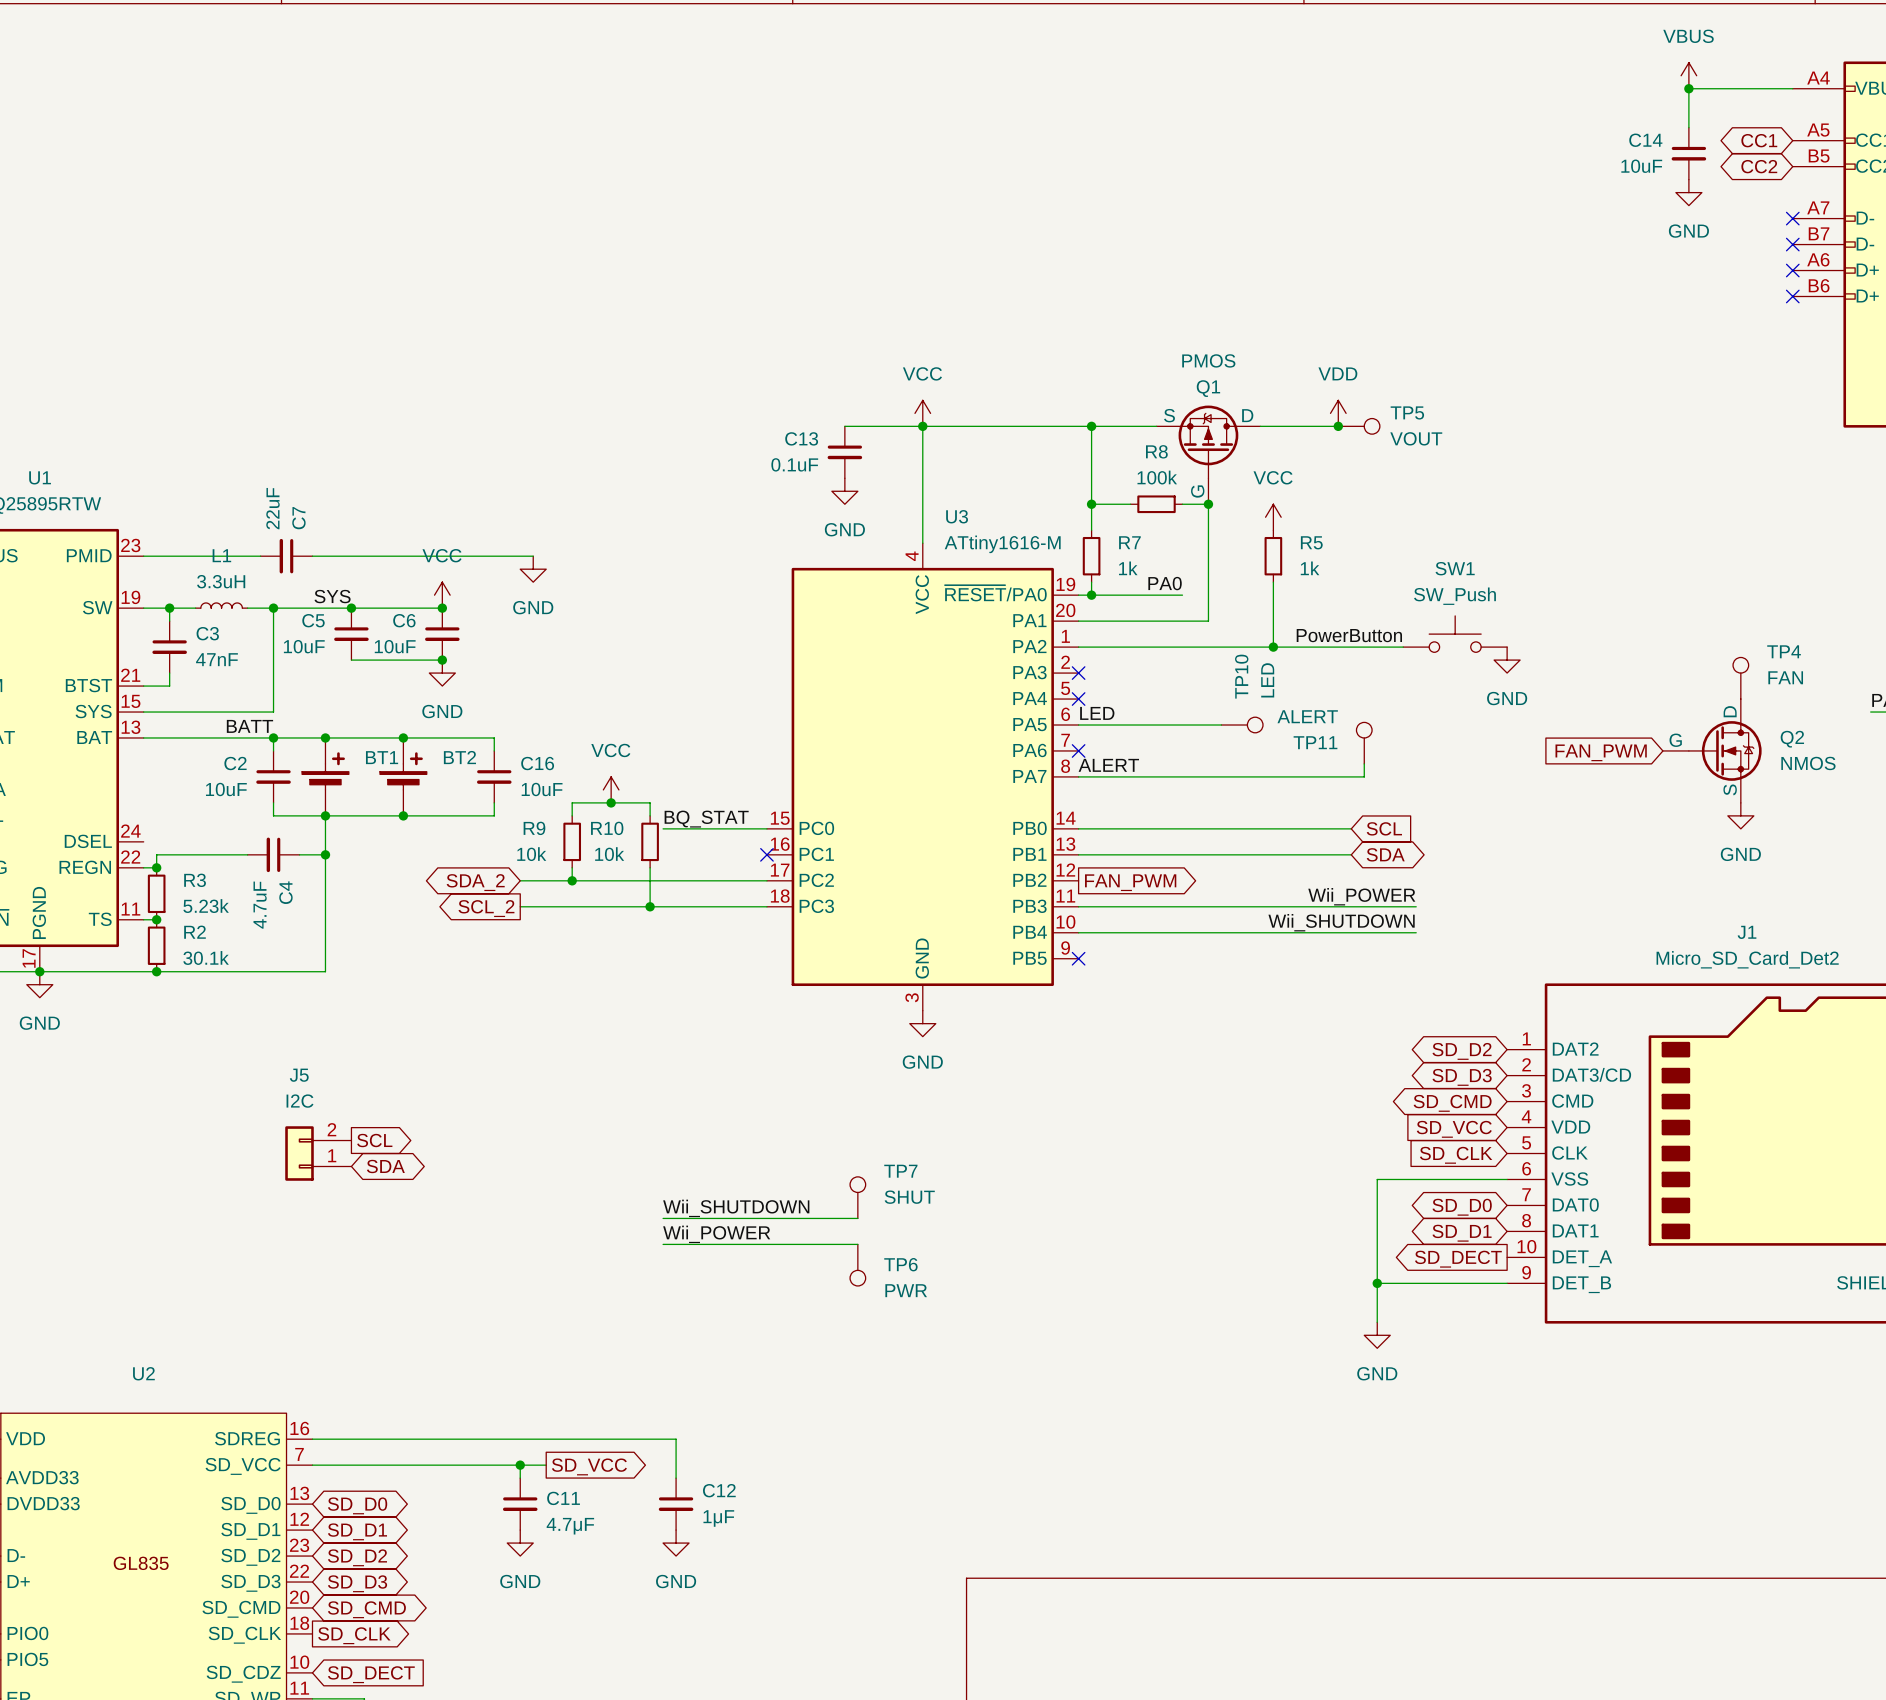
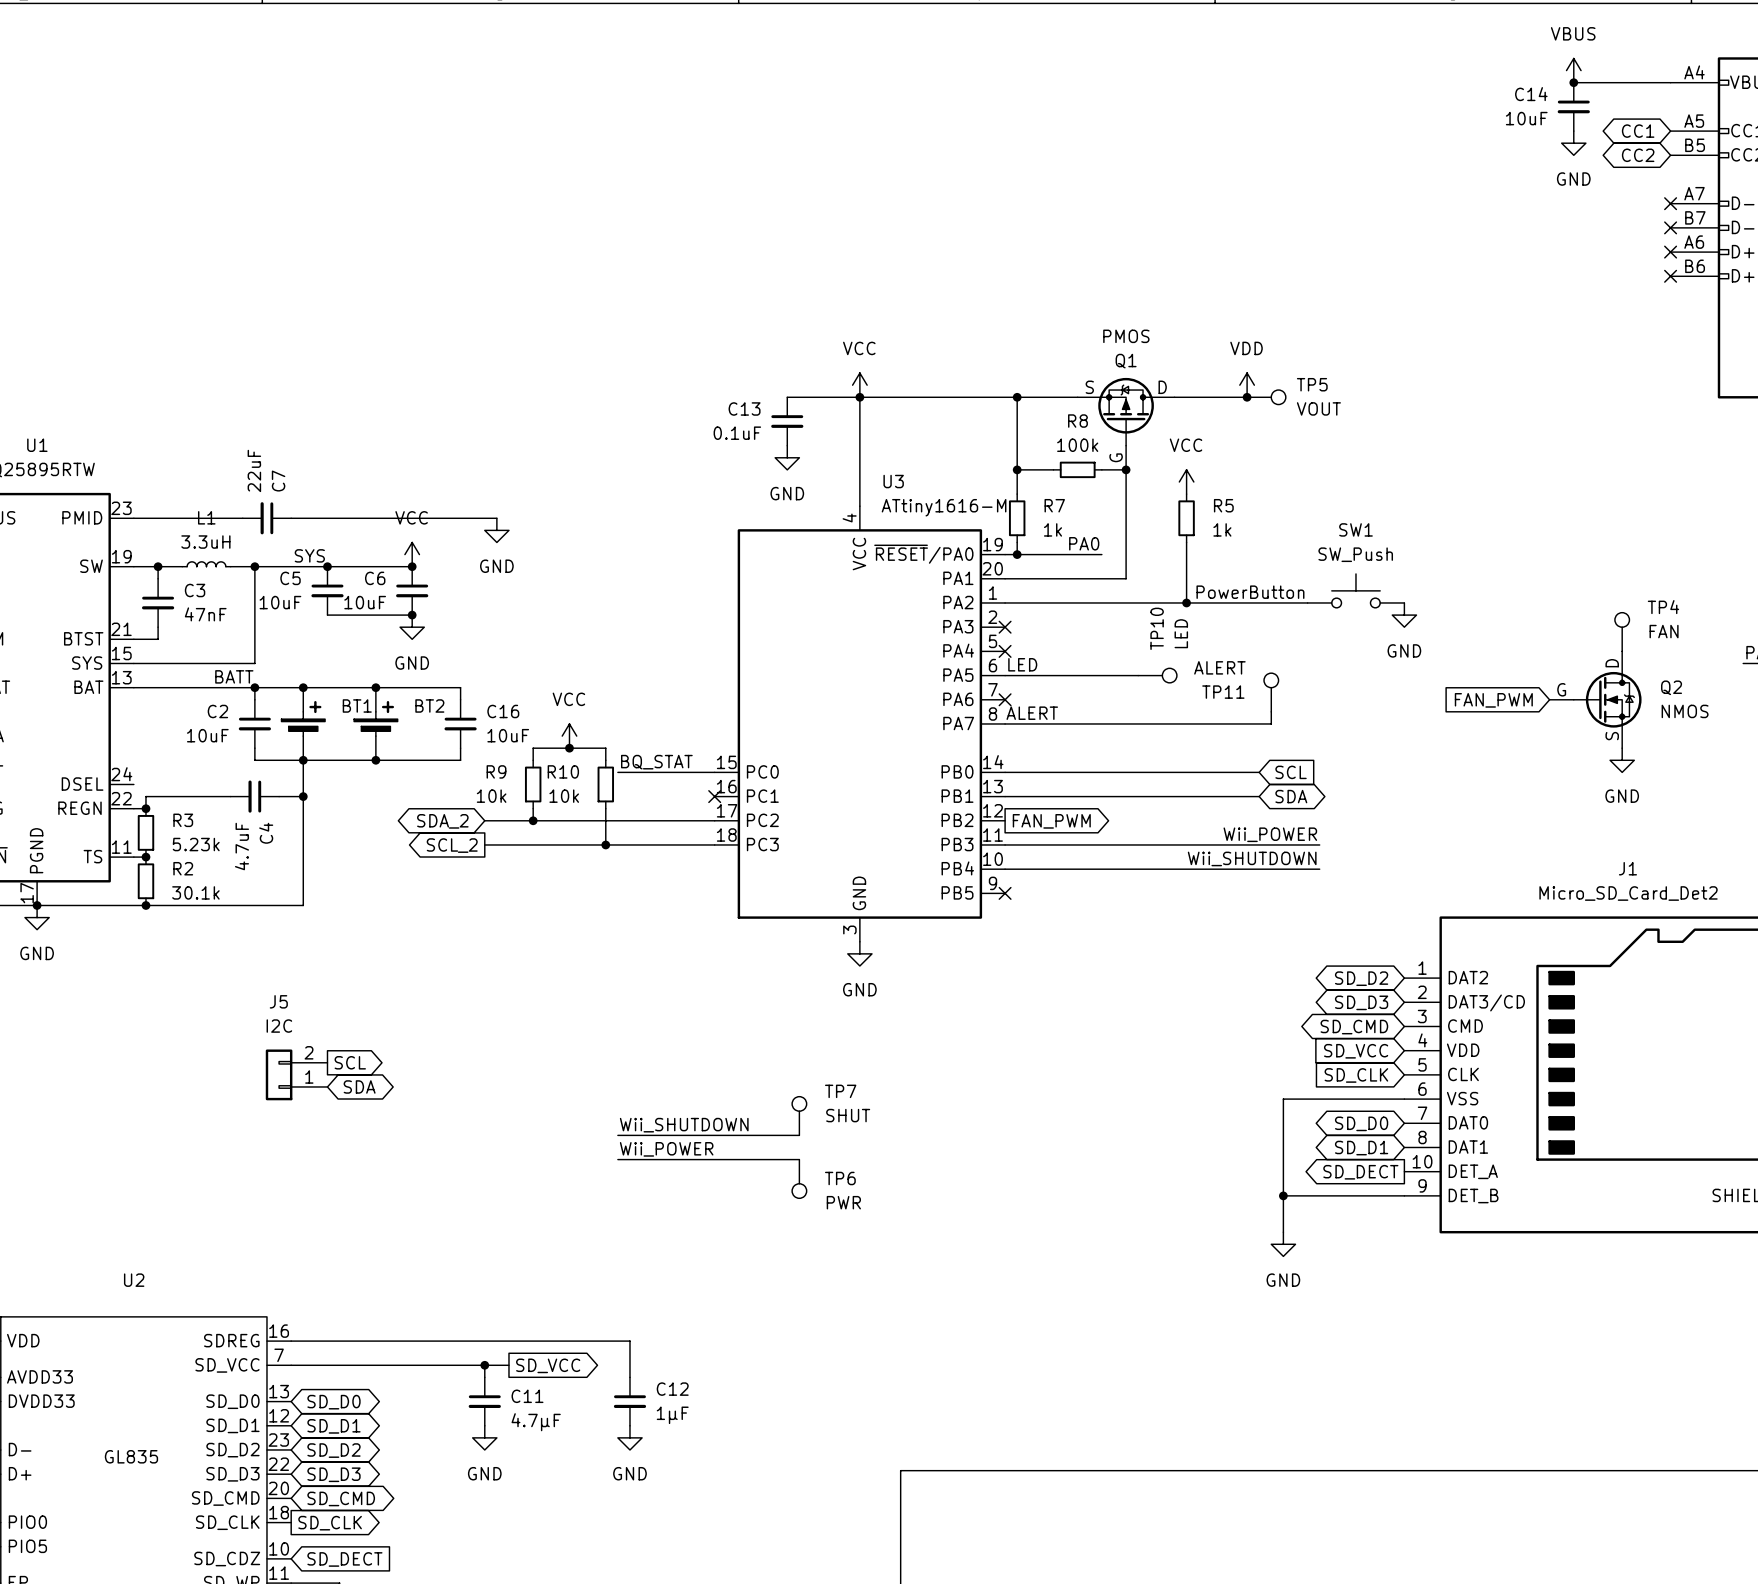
C14 position: (1688, 153) -> (1573, 106)
power symbol position: GND (1688, 192) -> GND (1573, 143)

